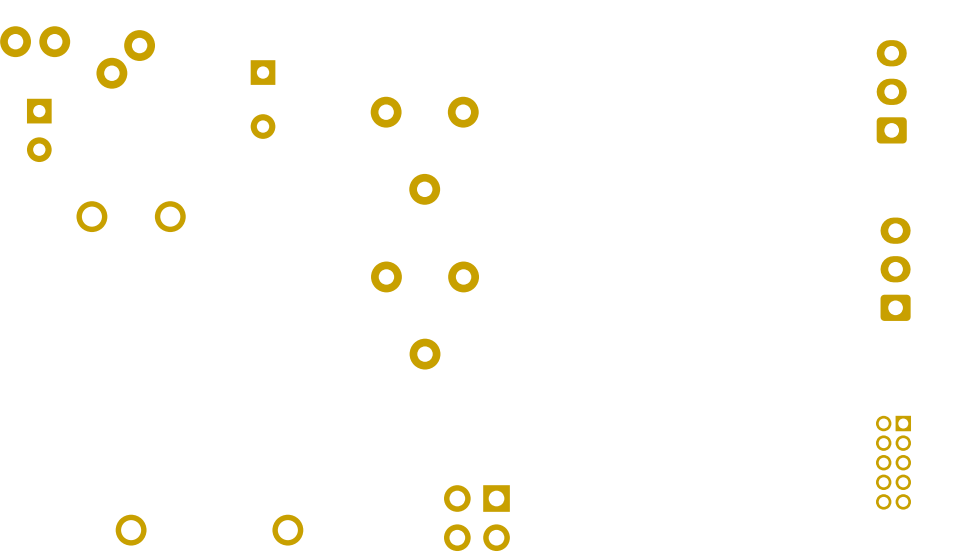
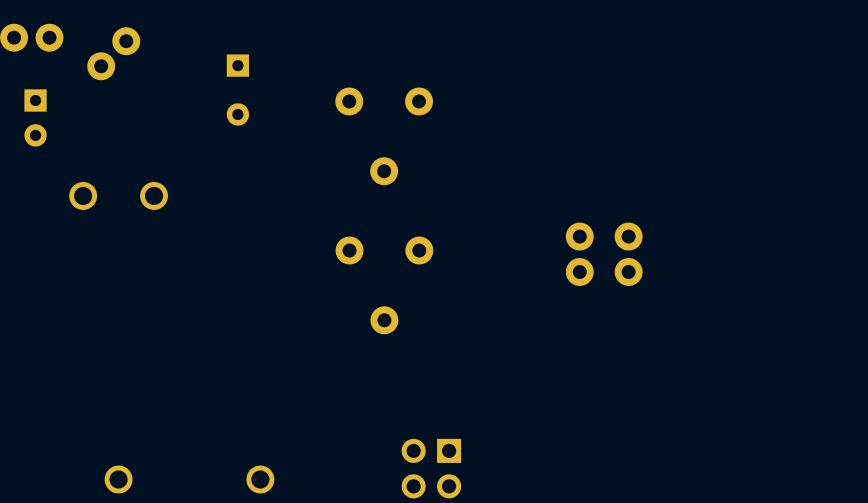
part: (891, 91) -> none
part: (895, 269) -> none
part: none -> (579, 254)
part: none -> (628, 254)
part: (893, 462) -> none

